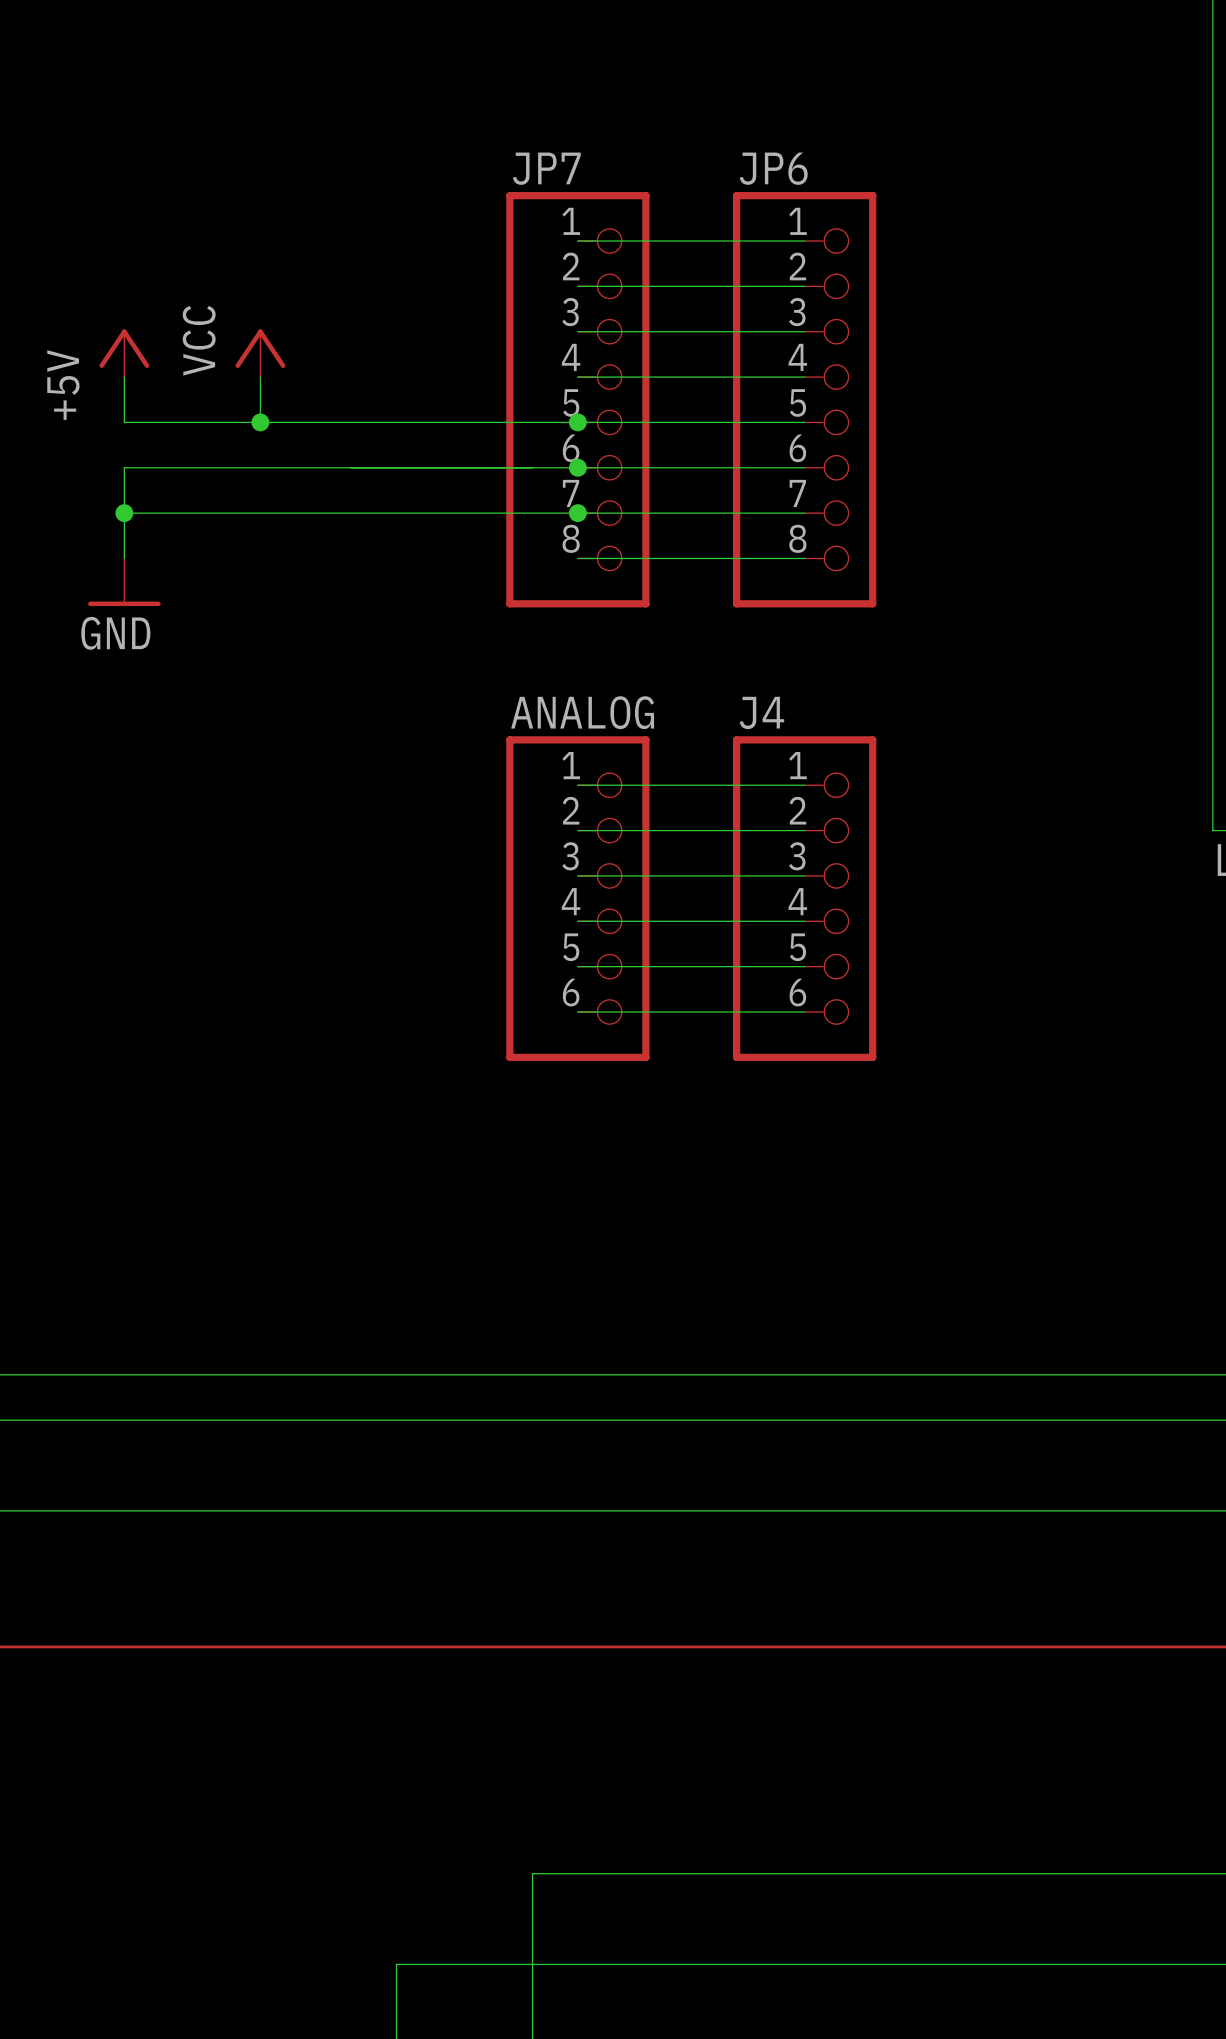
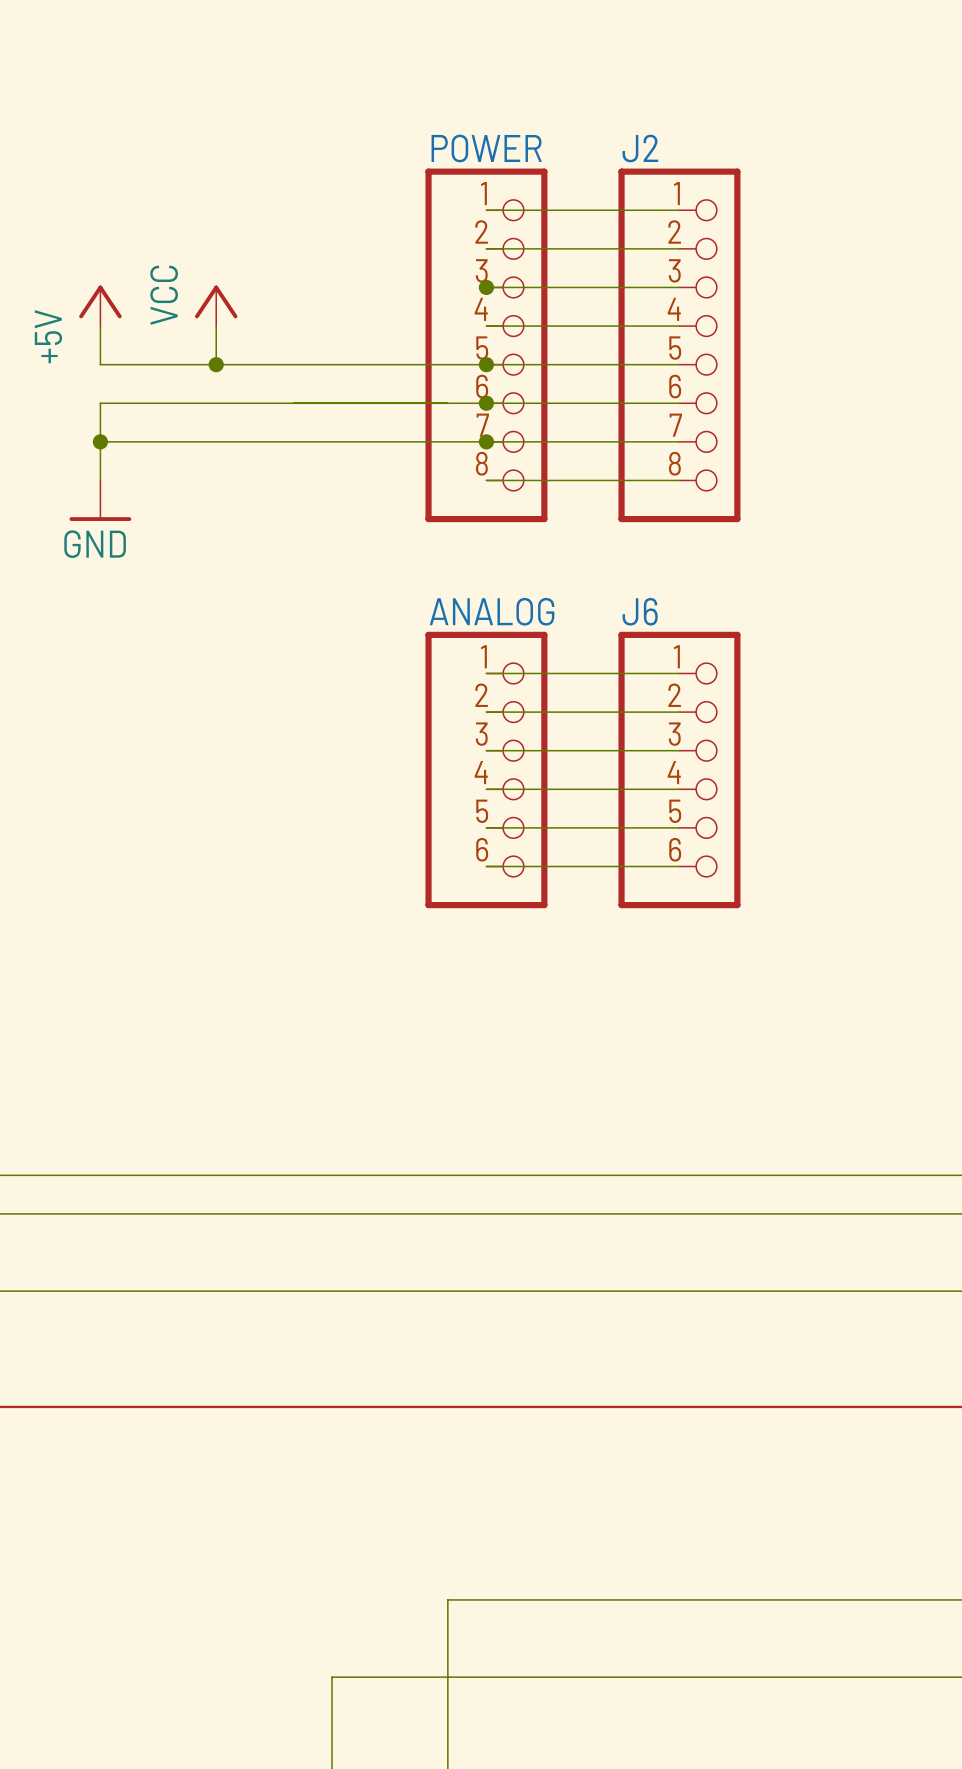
JP7 name: JP7 (546, 168) -> POWER (486, 148)
JP6 name: JP6 (773, 168) -> J2 (640, 148)
junction: none -> (486, 287)
J4 name: J4 (761, 712) -> J6 (640, 611)

